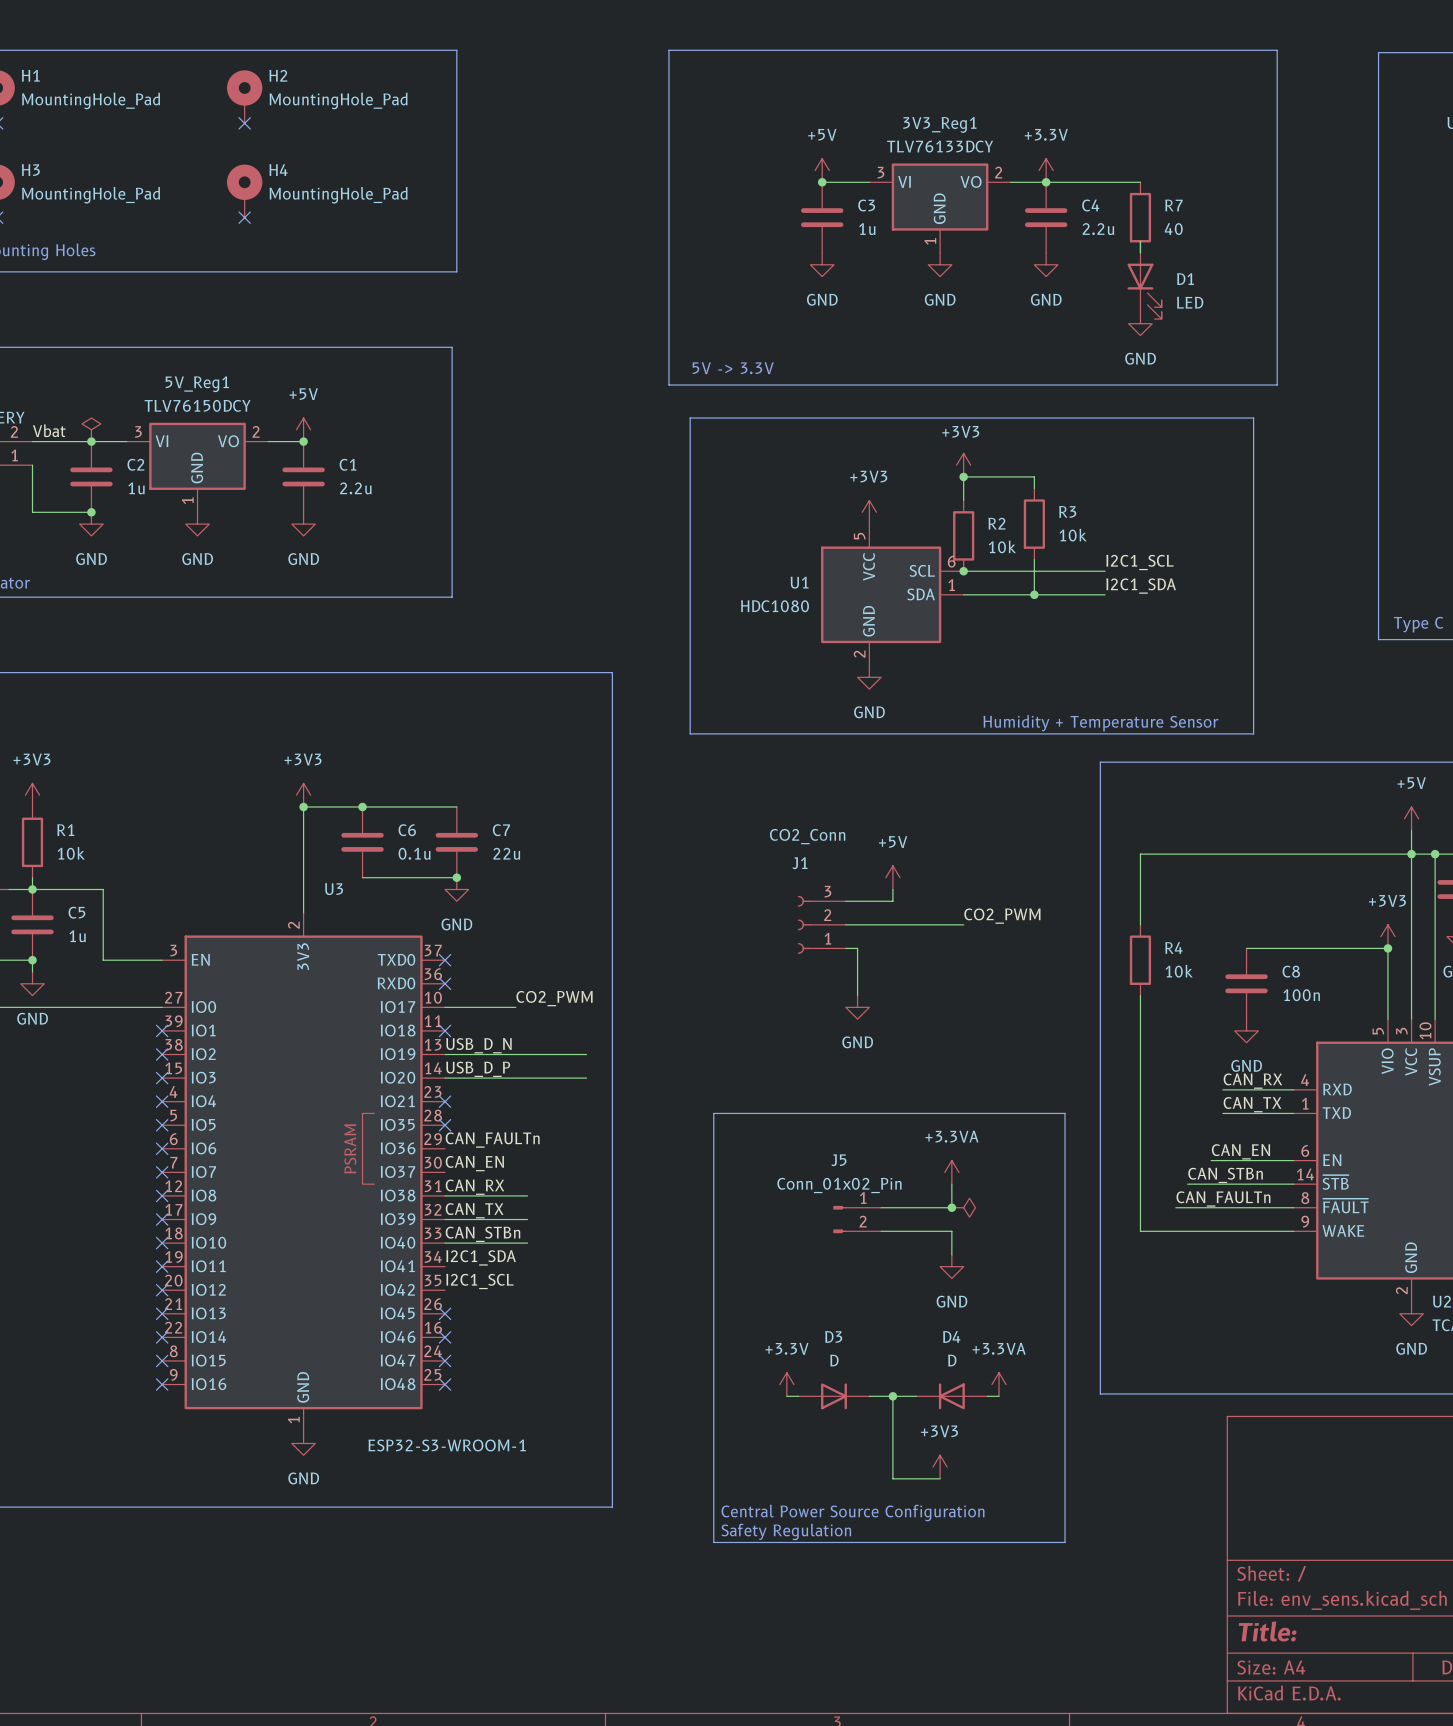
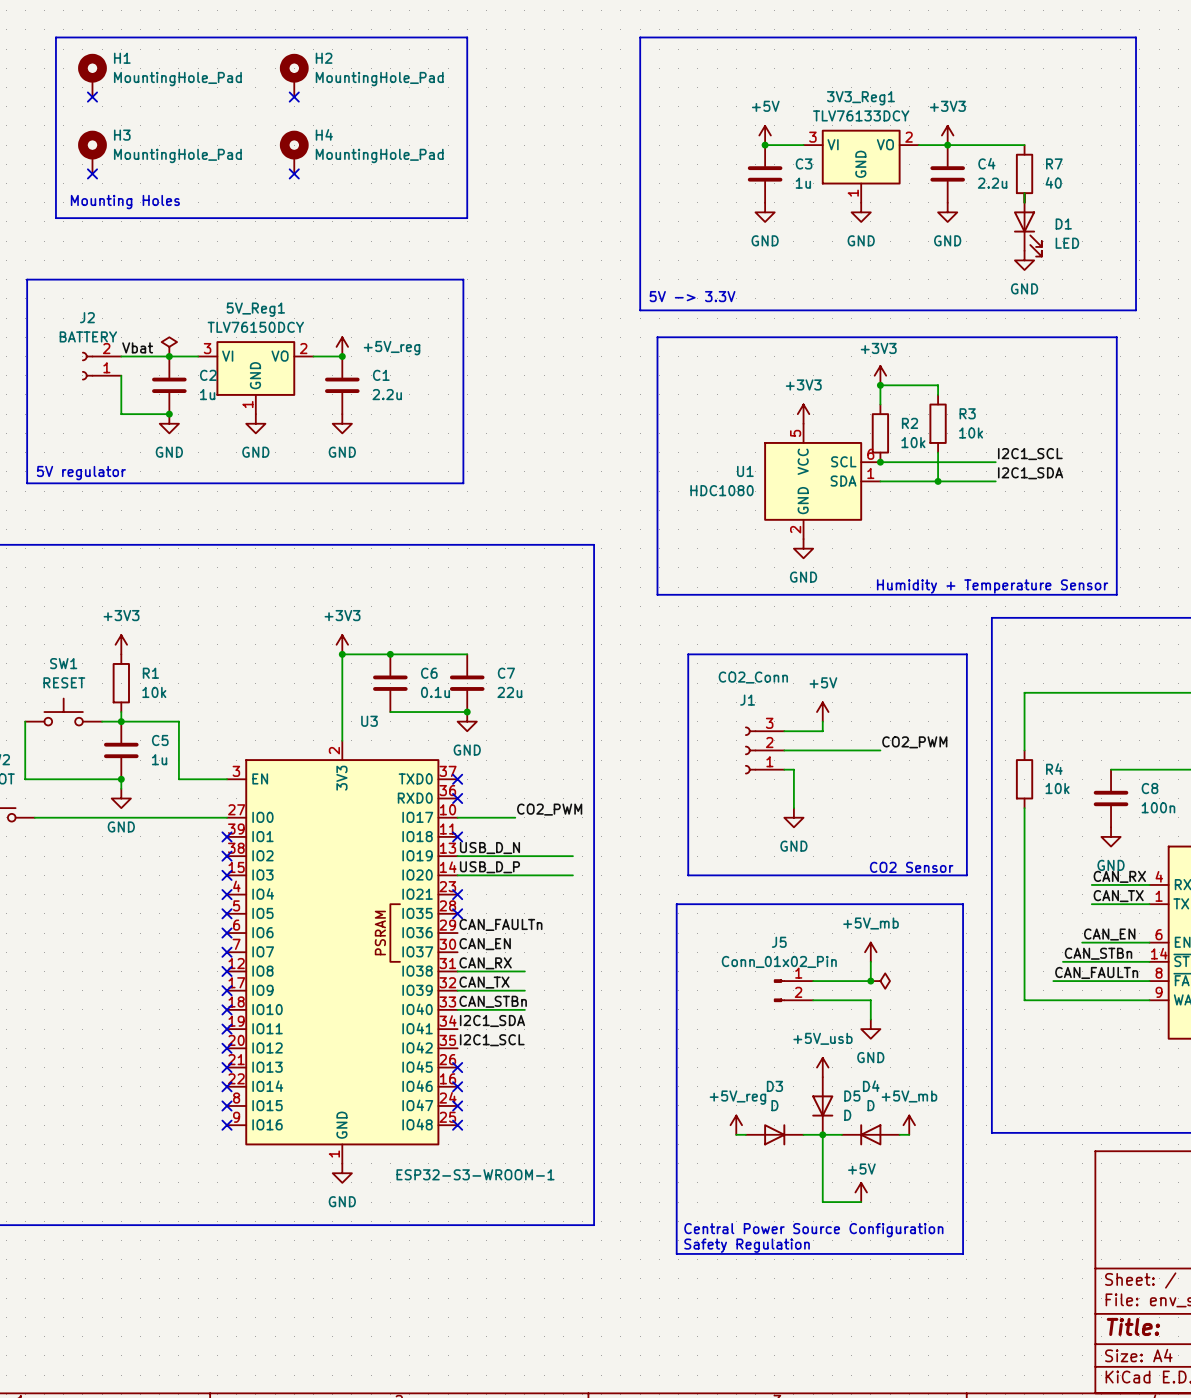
power symbol: +3.3V (1046, 170) -> +3V3 (947, 135)
power symbol: +5V (303, 429) -> +5V_reg (342, 346)
line: none -> (688, 654) (966, 654) (966, 875) (688, 875) (688, 654)
text: none -> CO2 Sensor (911, 867)
power symbol: +3.3VA (951, 1172) -> +5V_mb (870, 952)
power symbol: none -> +5V_usb (822, 1067)
D5: none -> D (822, 1105)
power symbol: +3.3V (786, 1384) -> +5V_reg (736, 1125)
power symbol: +3.3VA (999, 1384) -> +5V_mb (909, 1125)
power symbol: +3V3 (940, 1467) -> +5V (861, 1192)

